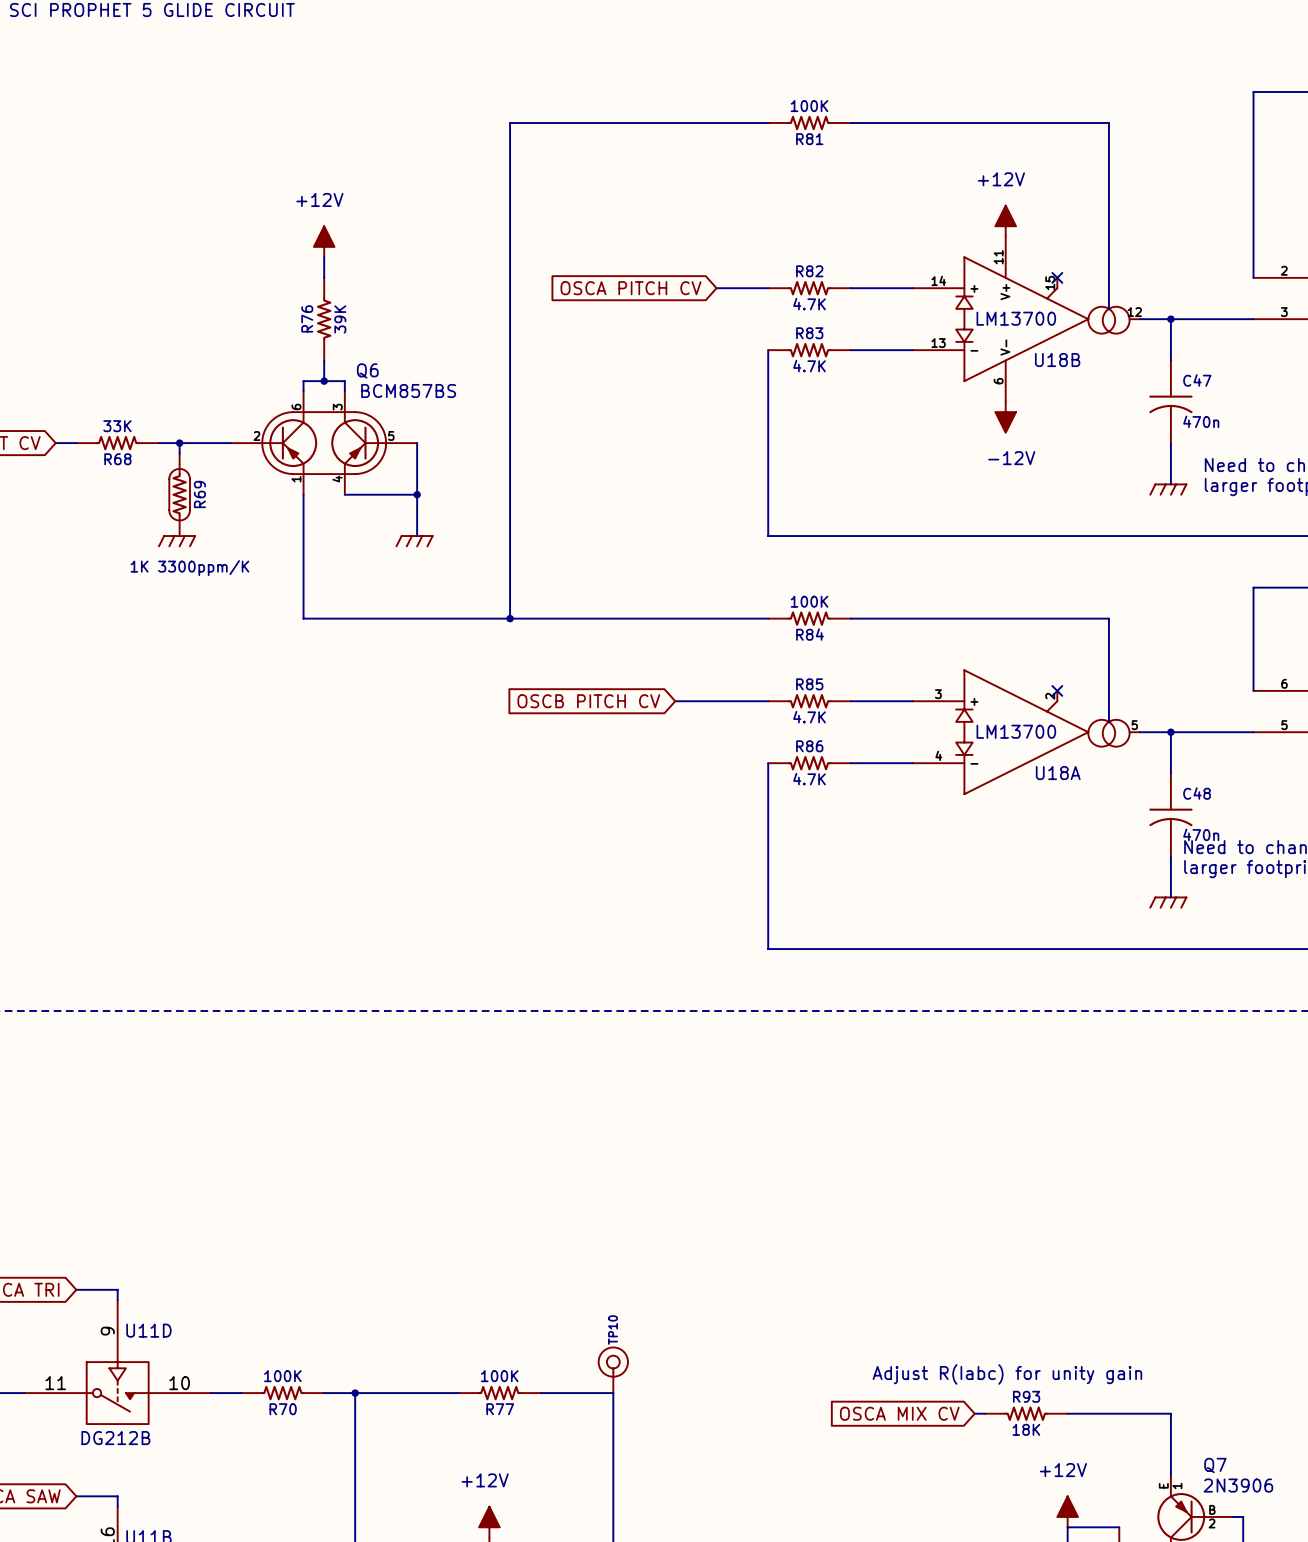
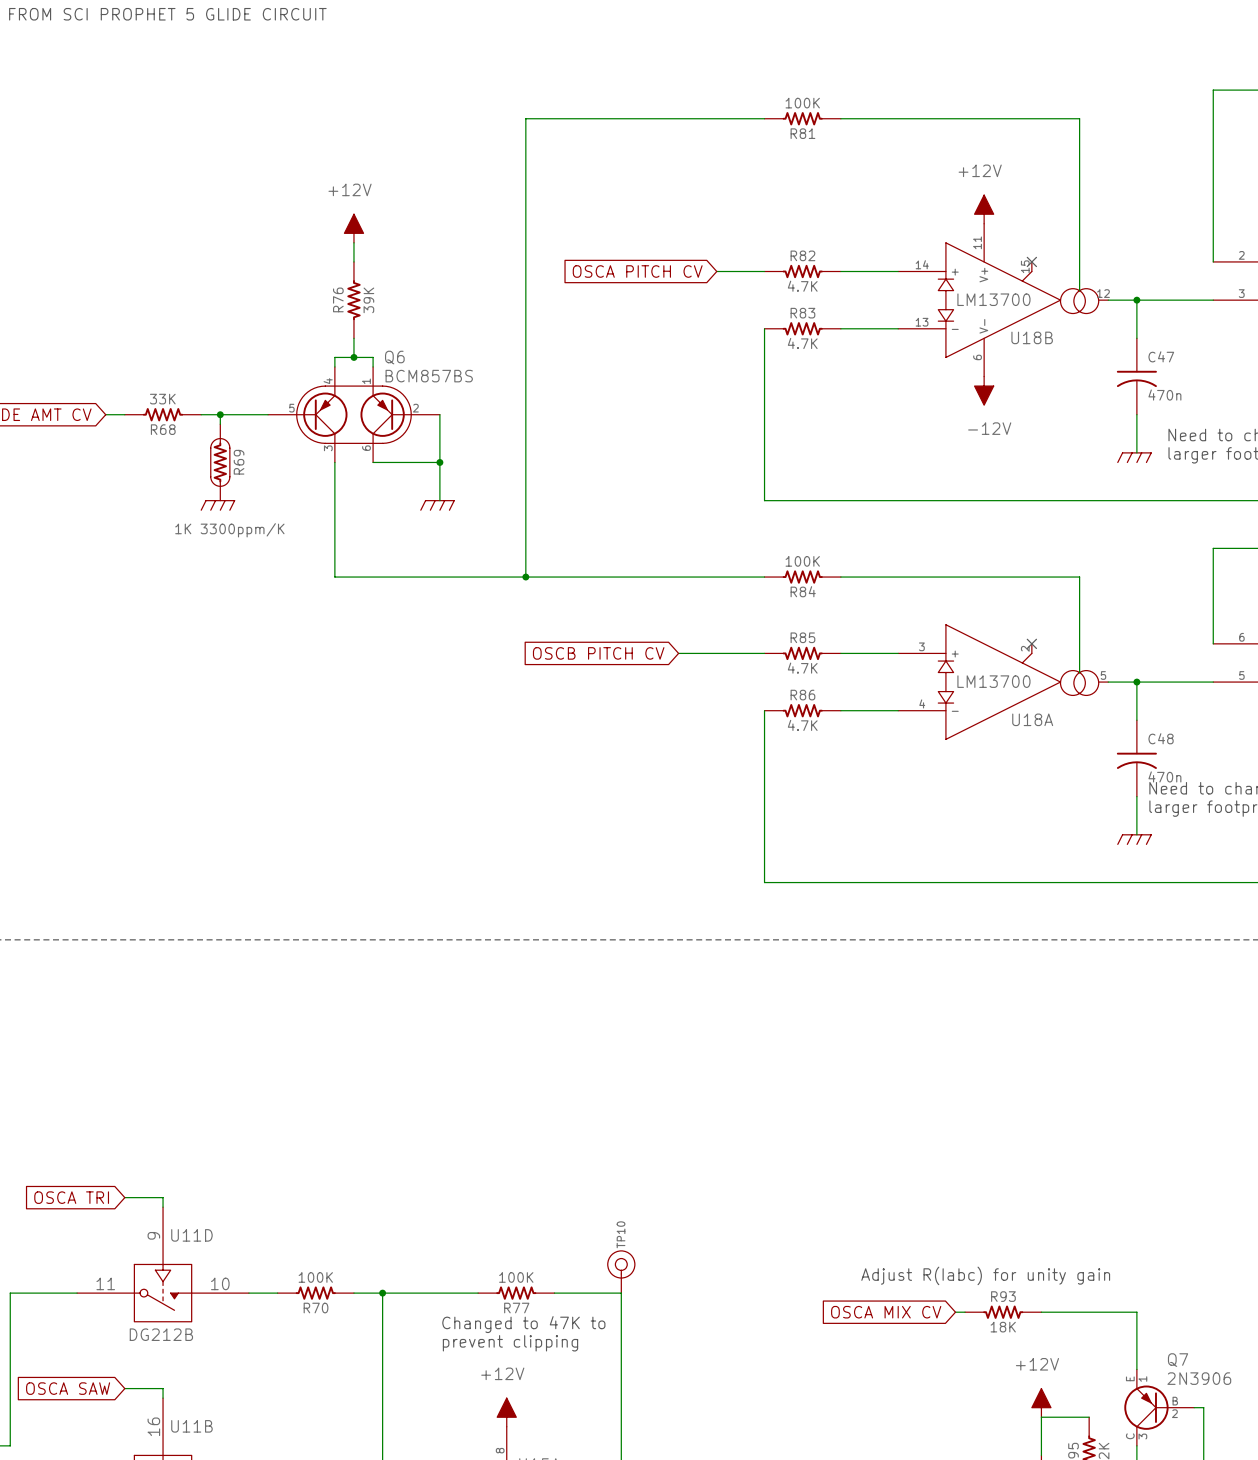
Q6 rotation: 0° (324, 443) -> 180° (353, 414)
text: none -> Changed to 47K to (523, 1324)
text: none -> prevent clipping (510, 1343)

